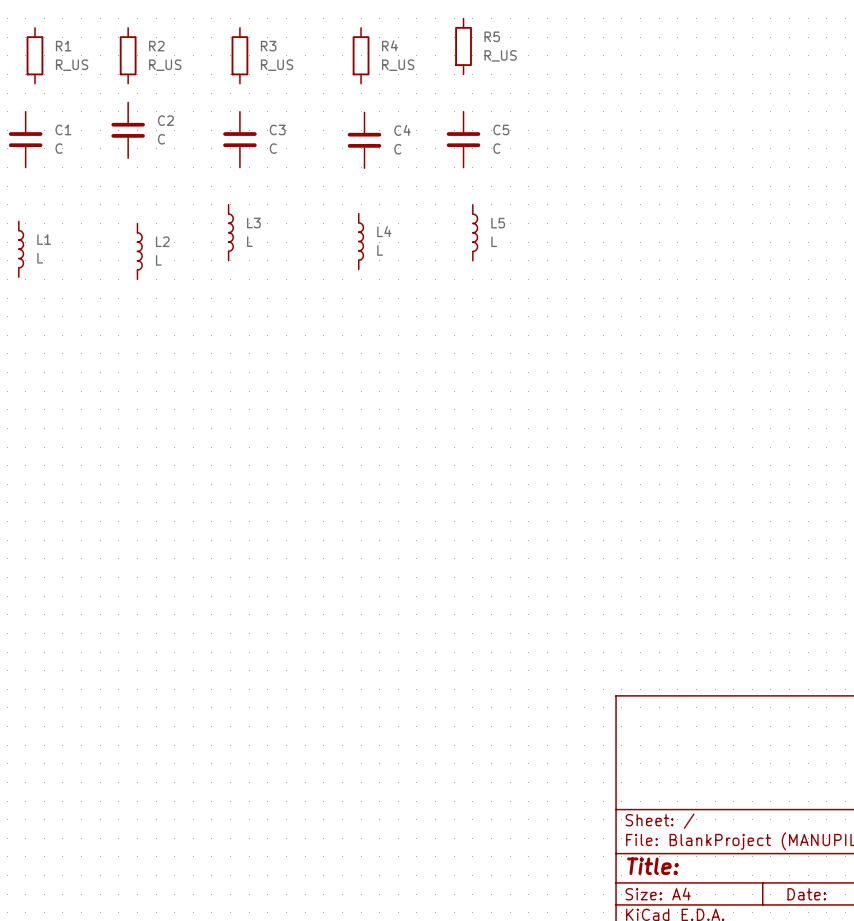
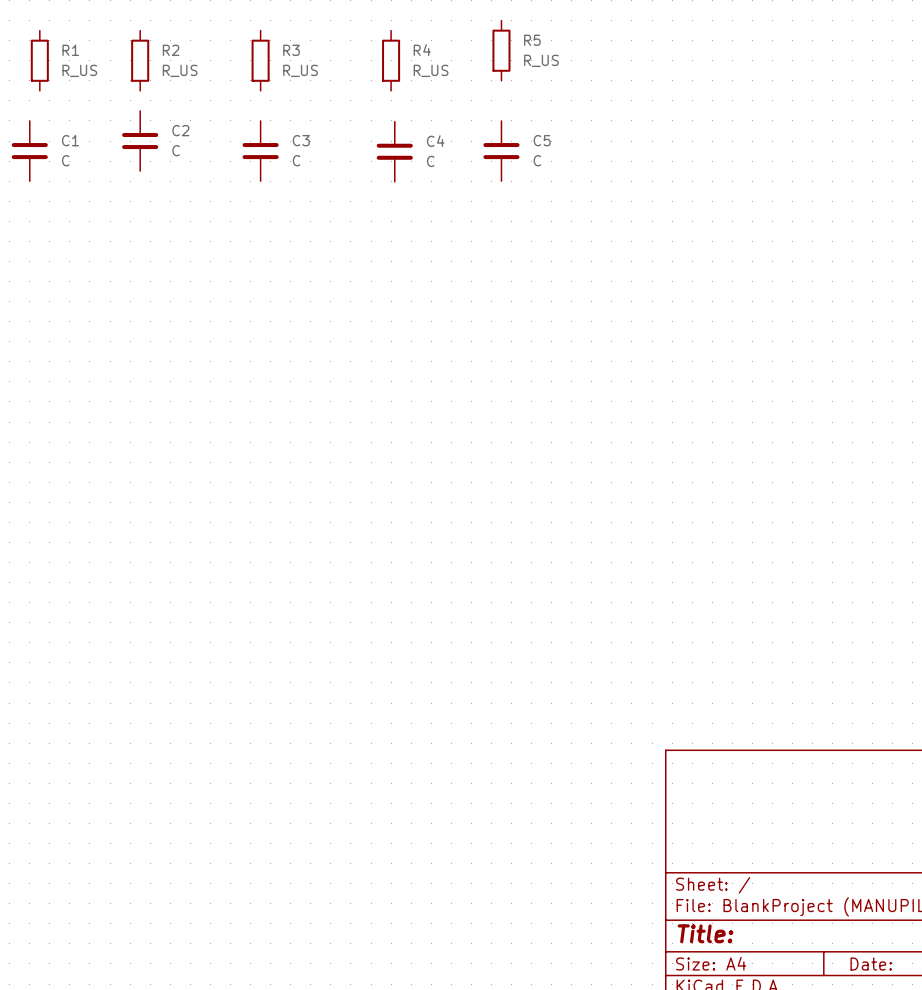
L3: L (230, 232) -> none
L5: L (475, 232) -> none
L4: L (361, 241) -> none
L1: L (21, 249) -> none
L2: L (139, 251) -> none

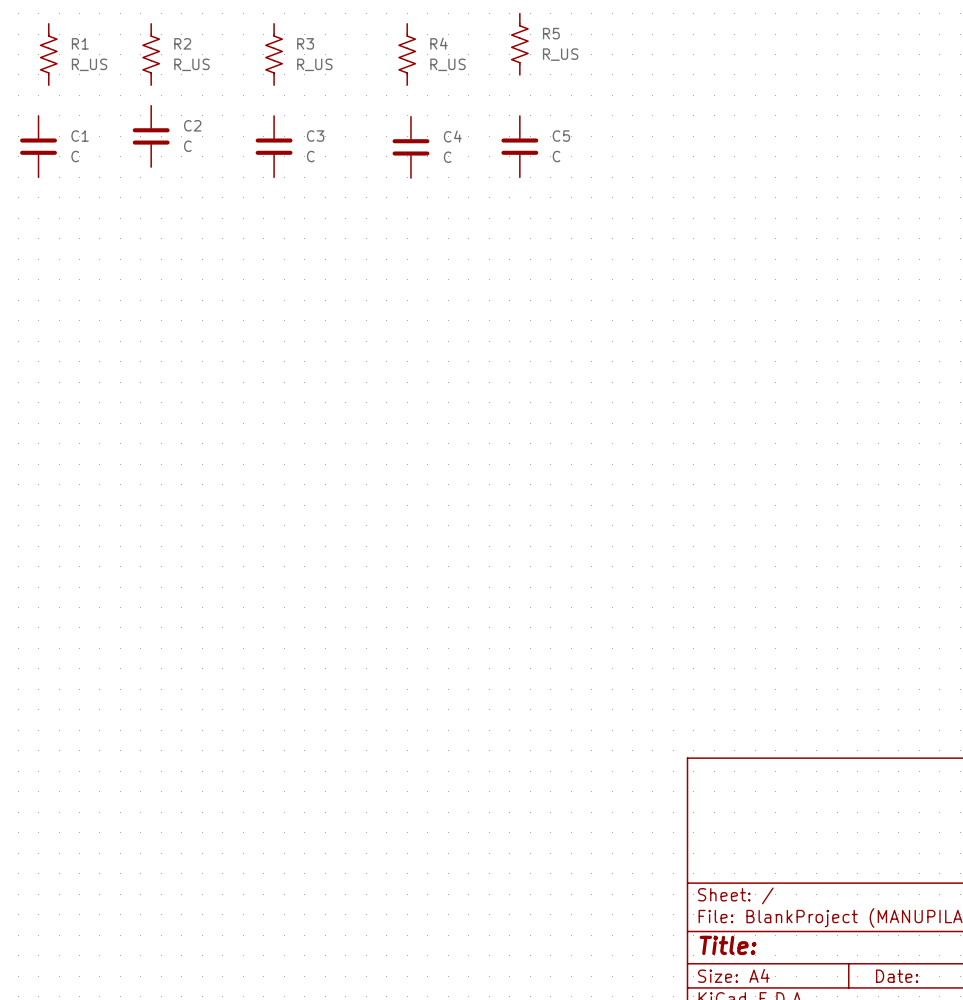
R5 symbol: [492, 20, 511, 81] -> [511, 13, 529, 75]
R1 symbol: [30, 30, 49, 91] -> [40, 23, 57, 86]
R2 symbol: [131, 30, 150, 91] -> [142, 23, 160, 86]
R3 symbol: [251, 30, 270, 91] -> [265, 23, 283, 86]
R4 symbol: [382, 30, 401, 91] -> [399, 23, 416, 86]

